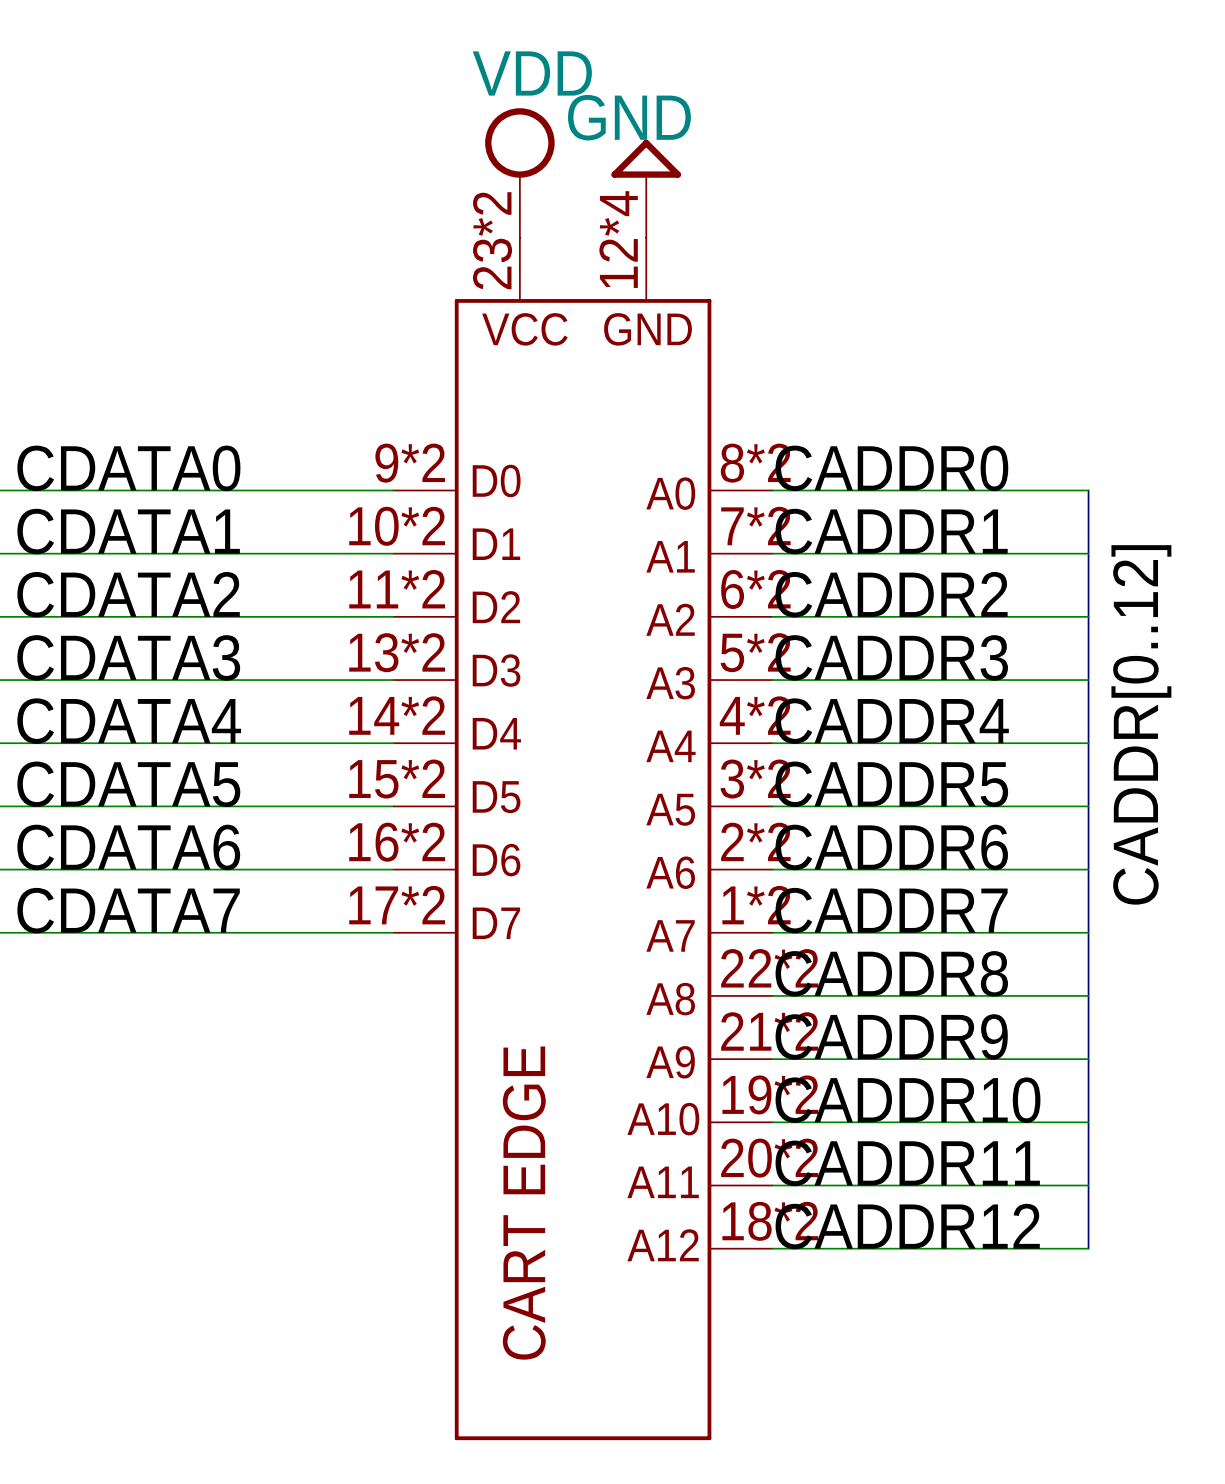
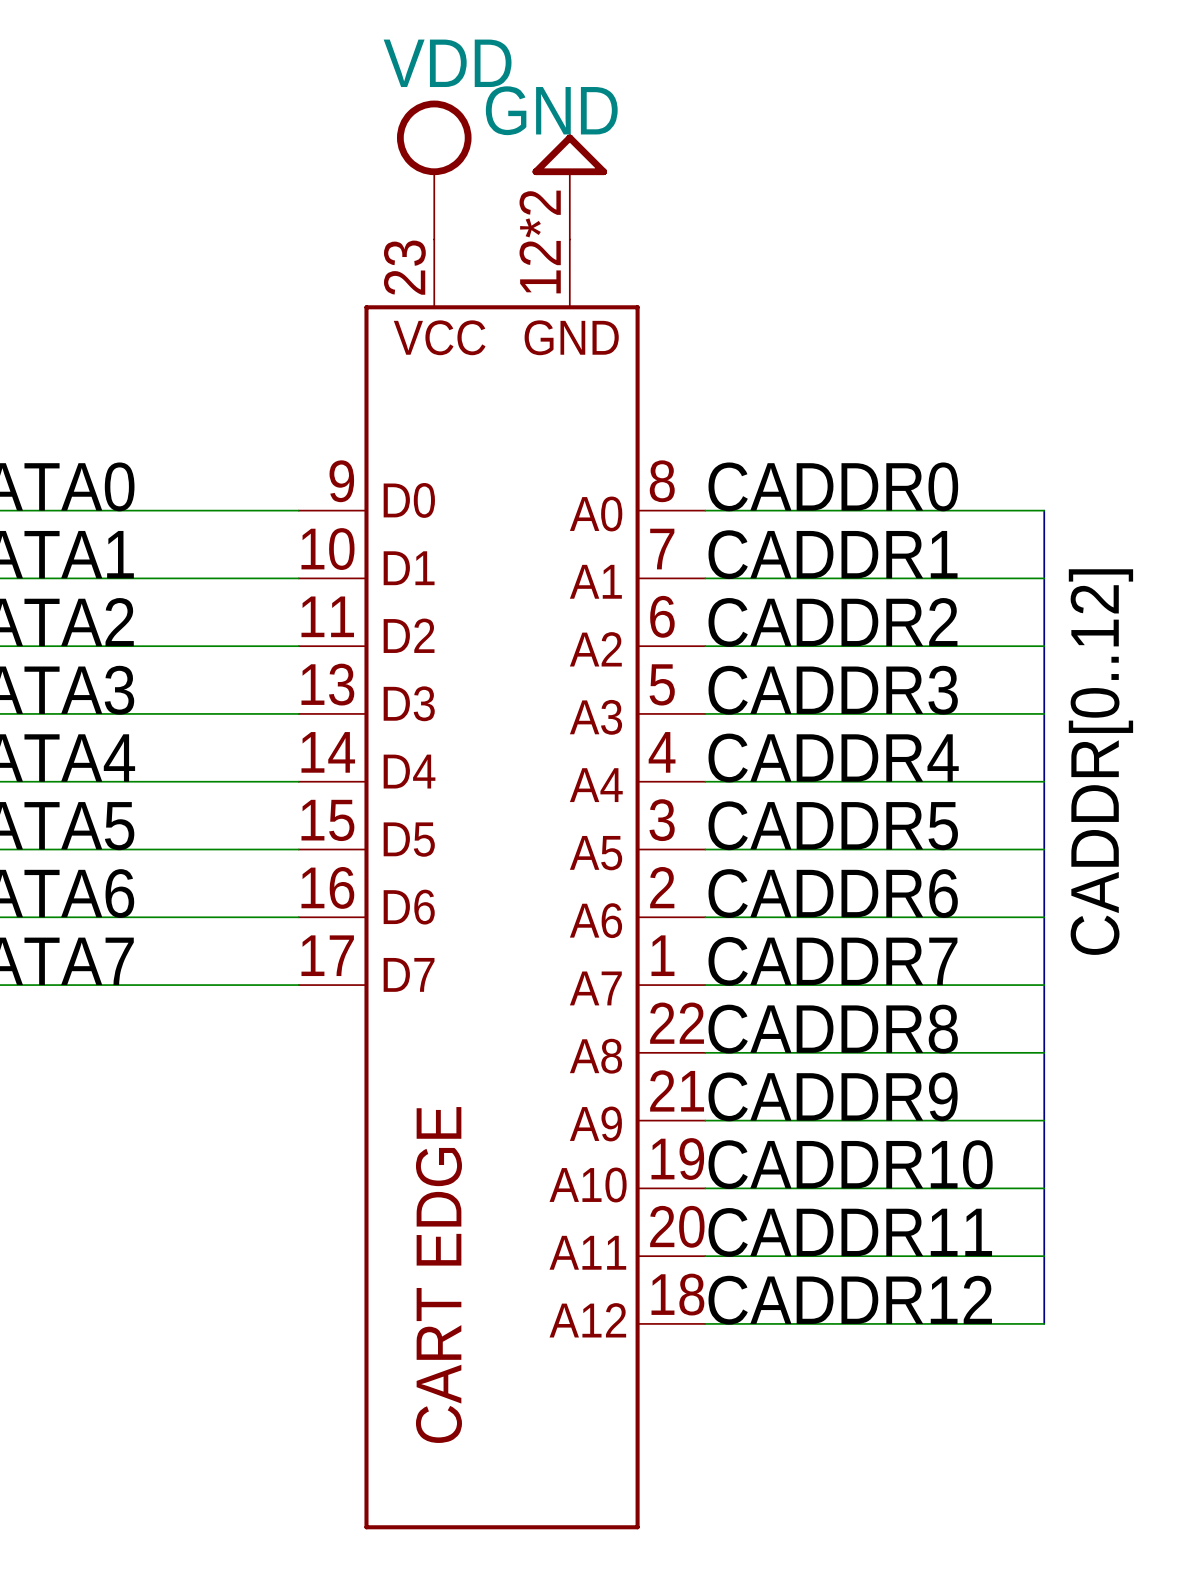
part symbol: [393, 237, 773, 1441] -> [298, 239, 706, 1530]

